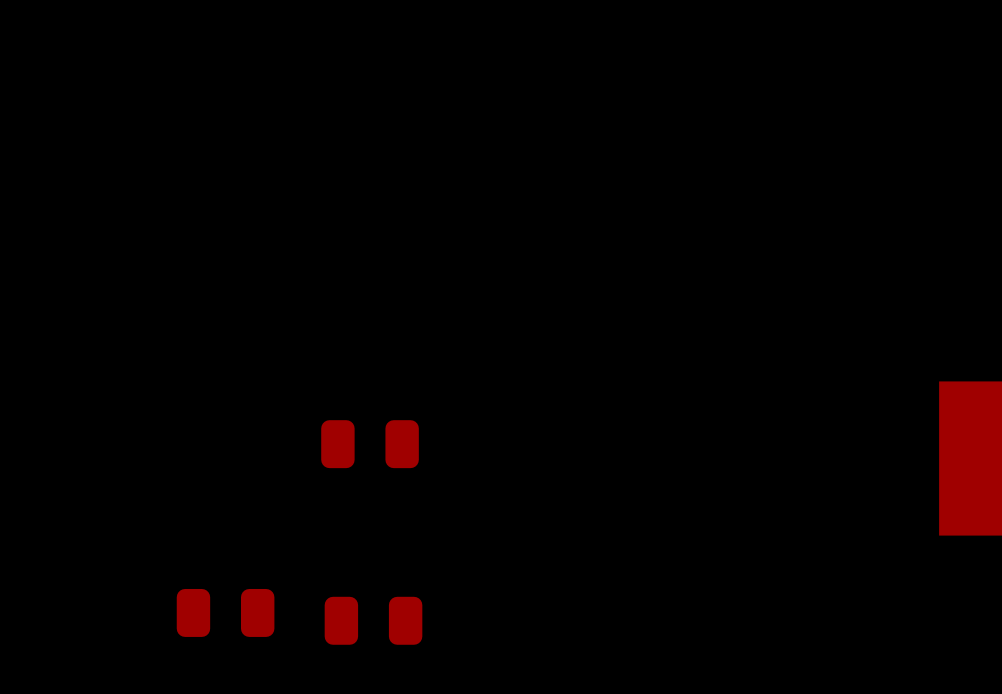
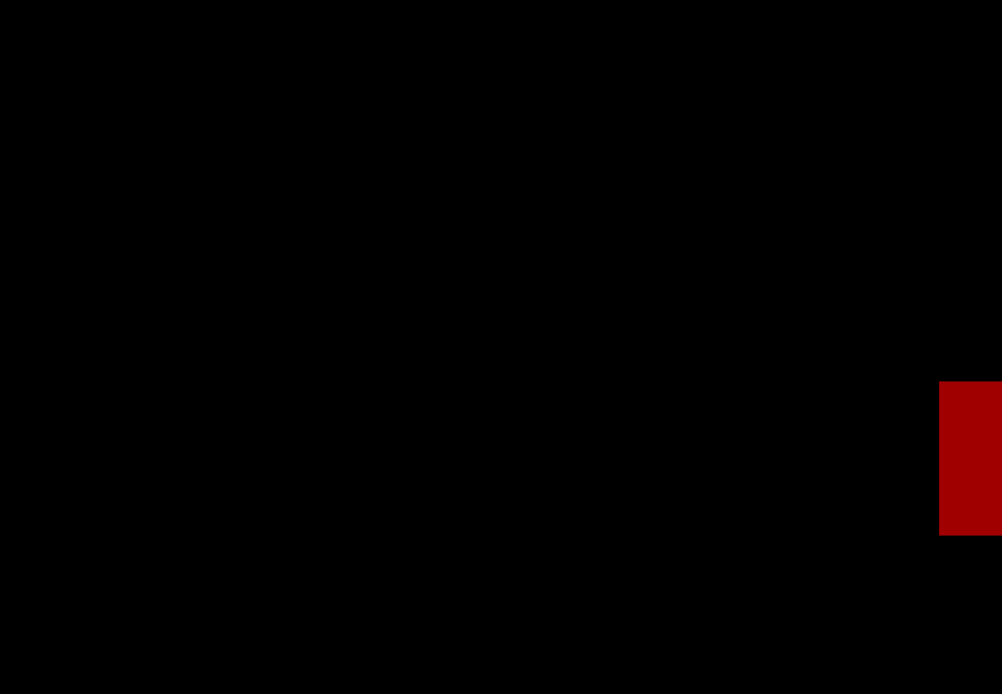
part: (370, 444) -> none
part: (225, 612) -> none
part: (373, 620) -> none

